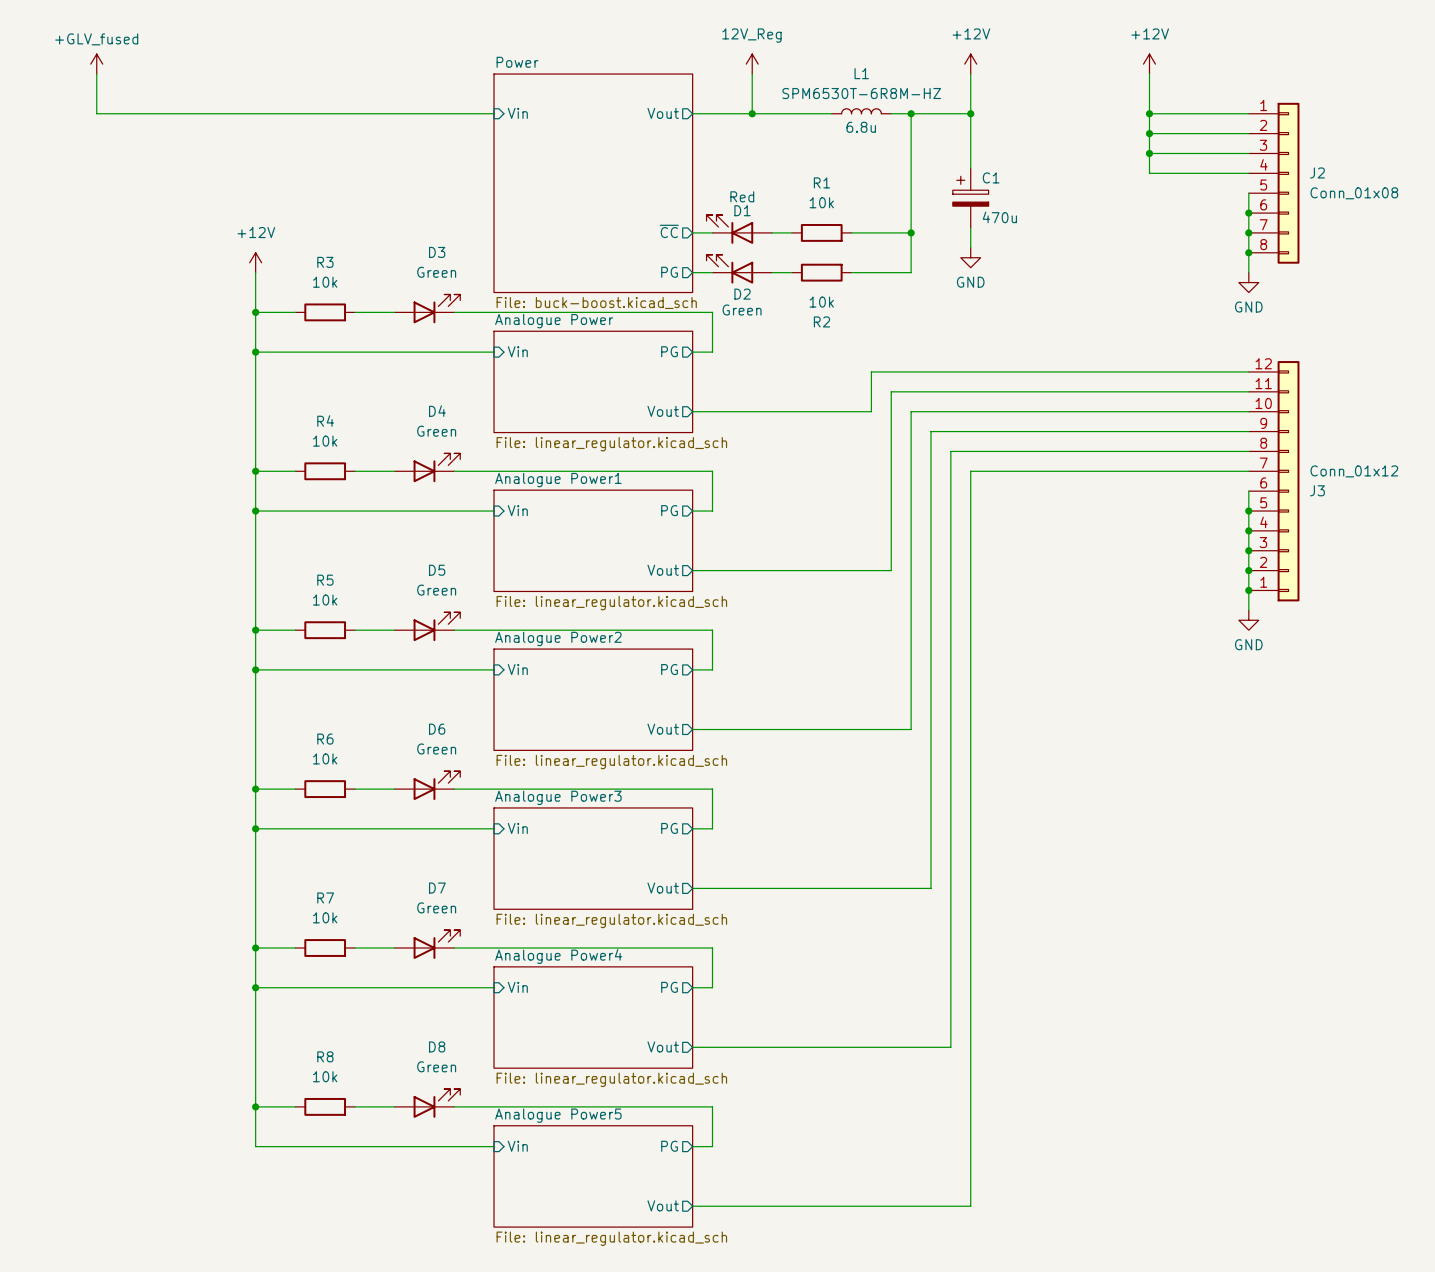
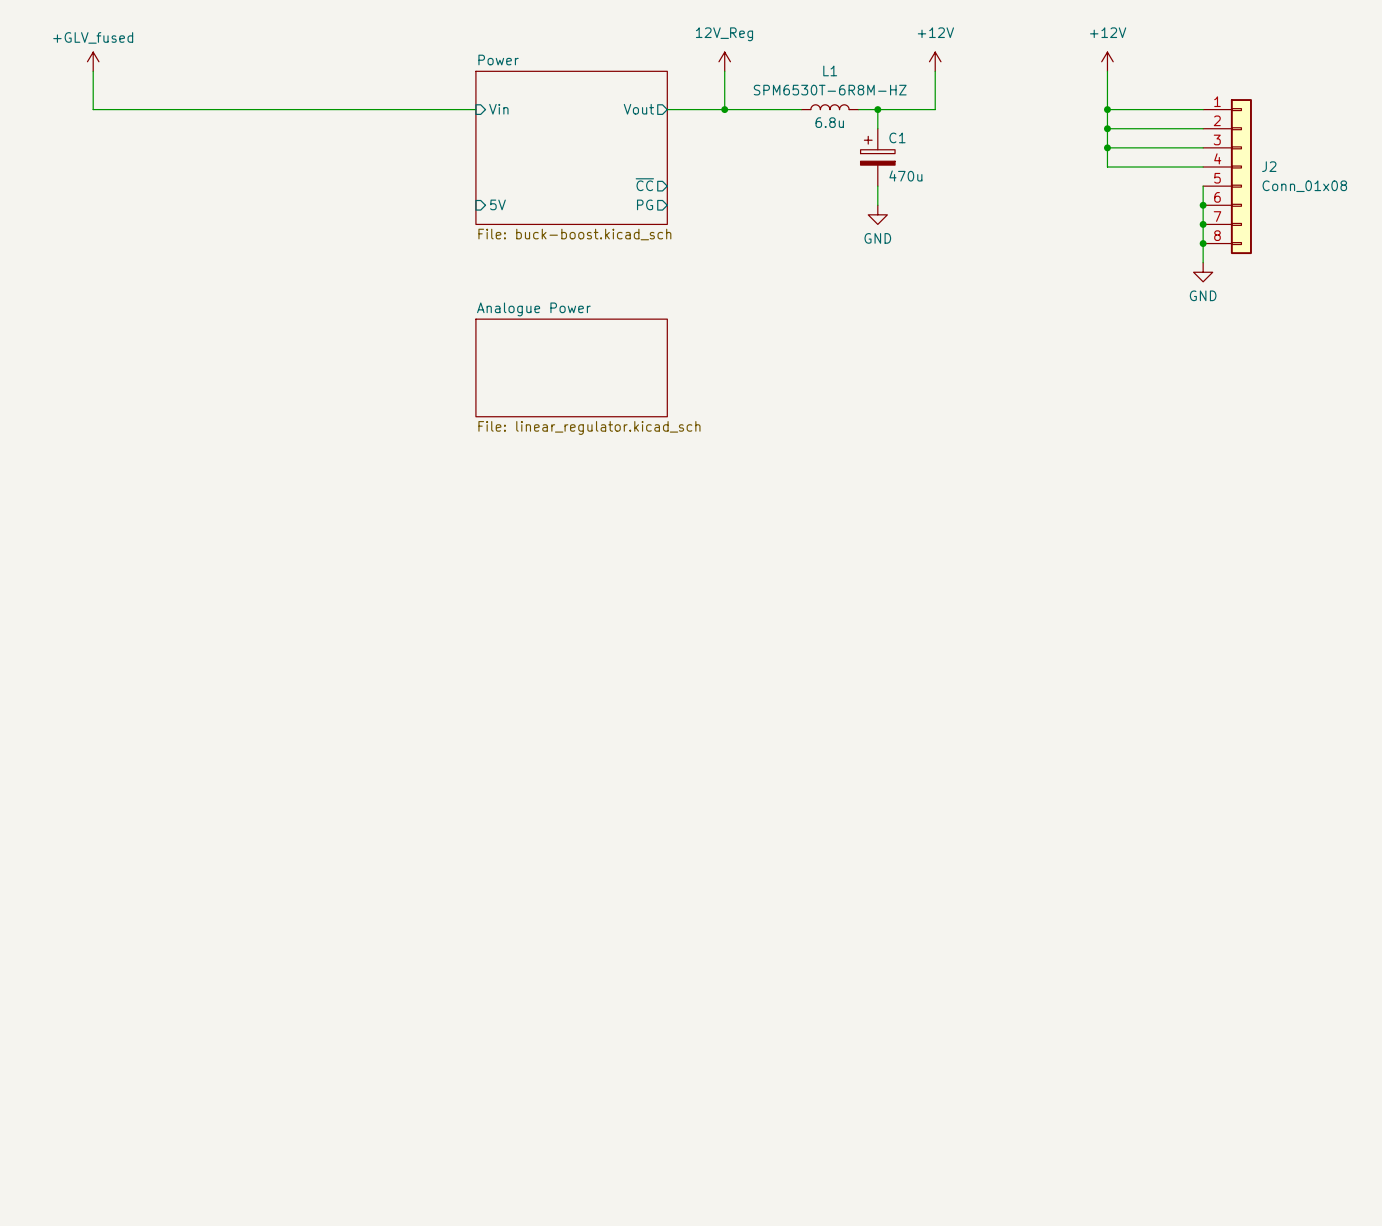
wire: (970, 113) (970, 168) -> none
junction: (970, 113) -> none
sheet Power: none -> File: buck-boost.kicad_sch (571, 147)
sheet Power: File: buck-boost.kicad_sch (593, 183) -> none
C1 position: (970, 198) -> (877, 157)
sheet pin: none -> 5V (497, 204)
wire: (911, 213) (911, 272) (851, 272) -> none
wire: (970, 227) (970, 247) -> none
D1: Red (739, 229) -> none
sheet pin position: ~{CC} (669, 231) -> ~{CC} (644, 184)
wire: (692, 232) (712, 232) -> none
wire: (772, 232) (791, 232) -> none
R1: 10k (821, 232) -> none
wire: (851, 232) (911, 232) -> none
junction: (911, 232) -> none
power symbol position: GND (970, 257) -> GND (877, 214)
power symbol: +12V (255, 262) -> none
D2: Green (739, 269) -> none
wire: (255, 272) (255, 1146) (494, 1146) -> none
sheet pin position: PG (669, 272) -> PG (645, 204)
wire: (692, 272) (712, 272) -> none
wire: (772, 272) (791, 272) -> none
R2: 10k (821, 272) -> none
D3: Green (427, 308) -> none
wire: (255, 312) (295, 312) -> none
junction: (255, 312) -> none
R3: 10k (325, 312) -> none
wire: (354, 312) (394, 312) -> none
wire: (454, 312) (712, 312) (712, 352) (692, 352) -> none
sheet pin: Vin (517, 351) -> none
sheet pin: PG (669, 351) -> none
wire: (255, 352) (494, 352) -> none
junction: (255, 352) -> none
wire: (1248, 371) (871, 371) (871, 411) (692, 411) -> none
wire: (1248, 391) (891, 391) (891, 570) (692, 570) -> none
sheet pin: Vout (663, 411) -> none
wire: (1248, 411) (911, 411) (911, 729) (692, 729) -> none
wire: (1248, 431) (930, 431) (930, 888) (692, 888) -> none
wire: (1248, 451) (950, 451) (950, 1047) (692, 1047) -> none
D4: Green (427, 467) -> none
wire: (255, 471) (295, 471) -> none
junction: (255, 471) -> none
R4: 10k (325, 471) -> none
wire: (354, 471) (394, 471) -> none
wire: (454, 471) (712, 471) (712, 511) (692, 511) -> none
wire: (1248, 471) (970, 471) (970, 1206) (692, 1206) -> none
J3: Conn_01x12 (1274, 481) -> none
wire: (1248, 491) (1248, 610) -> none
sheet pin: Vin (517, 510) -> none
sheet pin: PG (669, 510) -> none
wire: (255, 511) (494, 511) -> none
junction: (255, 511) -> none
junction: (1248, 511) -> none
junction: (1248, 530) -> none
sheet Analogue Power1: File: linear_regulator.kicad_sch (593, 540) -> none
junction: (1248, 550) -> none
sheet pin: Vout (663, 570) -> none
junction: (1248, 570) -> none
junction: (1248, 590) -> none
power symbol: GND (1248, 620) -> none
D5: Green (427, 626) -> none
wire: (255, 630) (295, 630) -> none
junction: (255, 630) -> none
R5: 10k (325, 630) -> none
wire: (354, 630) (394, 630) -> none
wire: (454, 630) (712, 630) (712, 669) (692, 669) -> none
wire: (255, 669) (494, 669) -> none
junction: (255, 669) -> none
sheet pin: Vin (517, 669) -> none
sheet pin: PG (669, 669) -> none
sheet Analogue Power2: File: linear_regulator.kicad_sch (593, 699) -> none
sheet pin: Vout (663, 729) -> none
D6: Green (427, 785) -> none
wire: (255, 789) (295, 789) -> none
junction: (255, 789) -> none
R6: 10k (325, 789) -> none
wire: (354, 789) (394, 789) -> none
wire: (454, 789) (712, 789) (712, 828) (692, 828) -> none
wire: (255, 828) (494, 828) -> none
junction: (255, 828) -> none
sheet pin: Vin (517, 828) -> none
sheet pin: PG (669, 828) -> none
sheet Analogue Power3: File: linear_regulator.kicad_sch (593, 858) -> none
sheet pin: Vout (663, 888) -> none
D7: Green (427, 944) -> none
wire: (255, 948) (295, 948) -> none
junction: (255, 948) -> none
R7: 10k (325, 948) -> none
wire: (354, 948) (394, 948) -> none
wire: (454, 948) (712, 948) (712, 987) (692, 987) -> none
wire: (255, 987) (494, 987) -> none
junction: (255, 987) -> none
sheet pin: Vin (517, 987) -> none
sheet pin: PG (669, 987) -> none
sheet Analogue Power4: File: linear_regulator.kicad_sch (593, 1017) -> none
sheet pin: Vout (663, 1046) -> none
D8: Green (427, 1103) -> none
wire: (255, 1106) (295, 1106) -> none
junction: (255, 1106) -> none
R8: 10k (325, 1106) -> none
wire: (354, 1106) (394, 1106) -> none
wire: (454, 1106) (712, 1106) (712, 1146) (692, 1146) -> none
sheet pin: Vin (517, 1146) -> none
sheet pin: PG (669, 1146) -> none
sheet Analogue Power5: File: linear_regulator.kicad_sch (593, 1176) -> none
sheet pin: Vout (663, 1205) -> none

